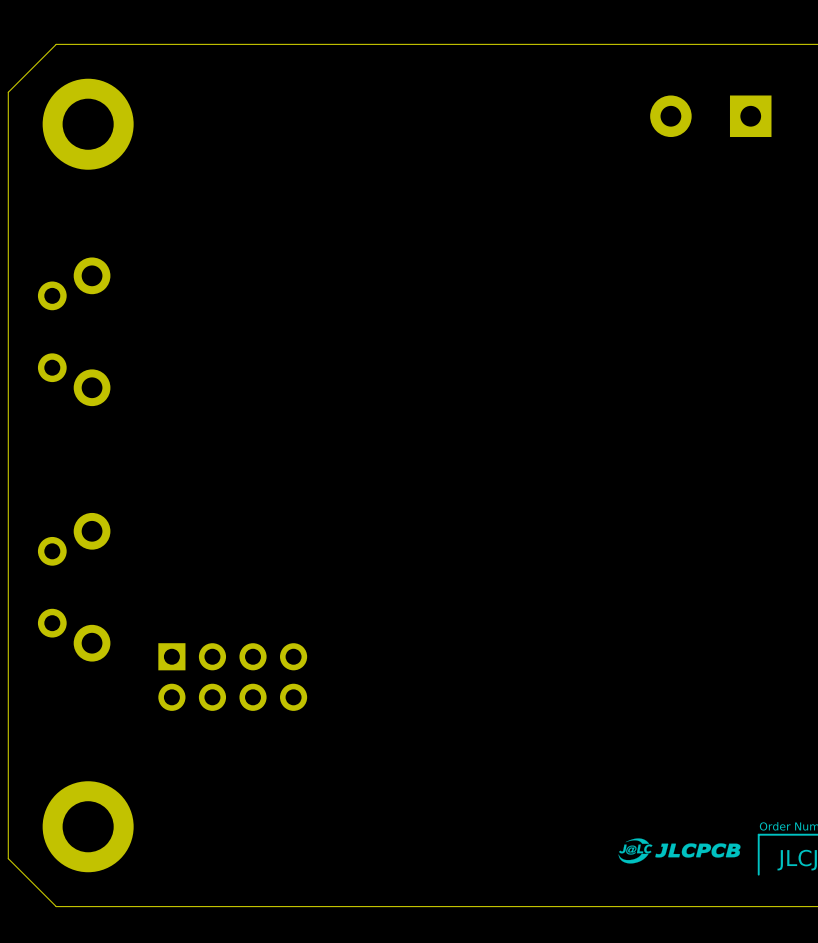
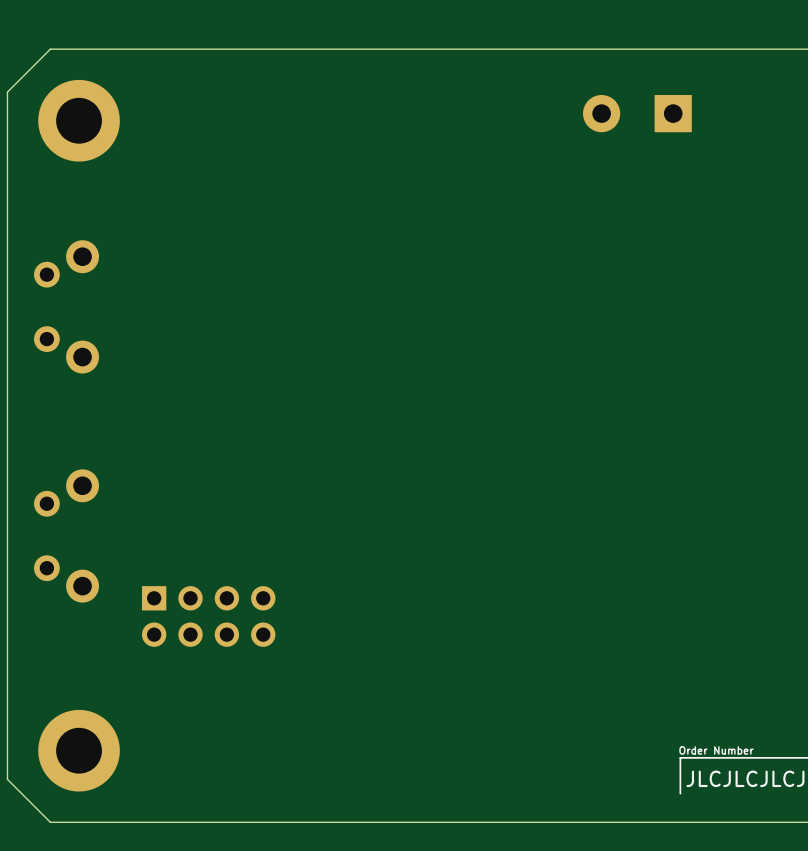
drawing: [618, 838, 741, 864] -> none

